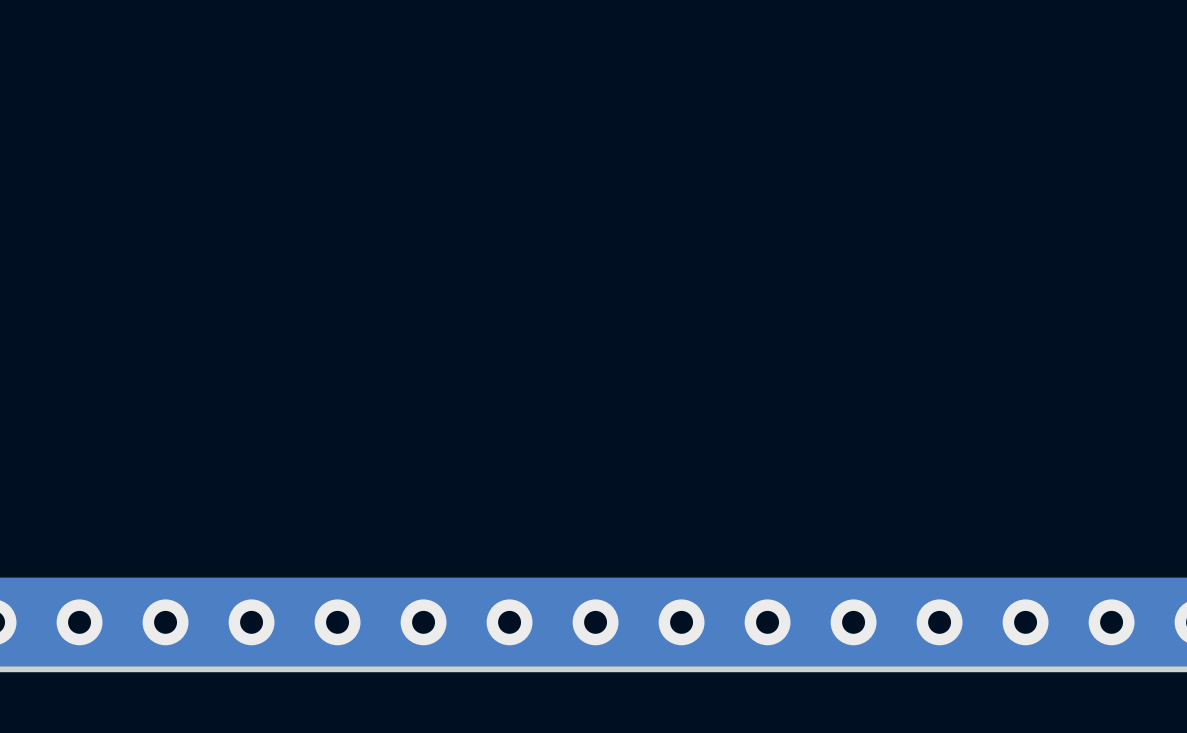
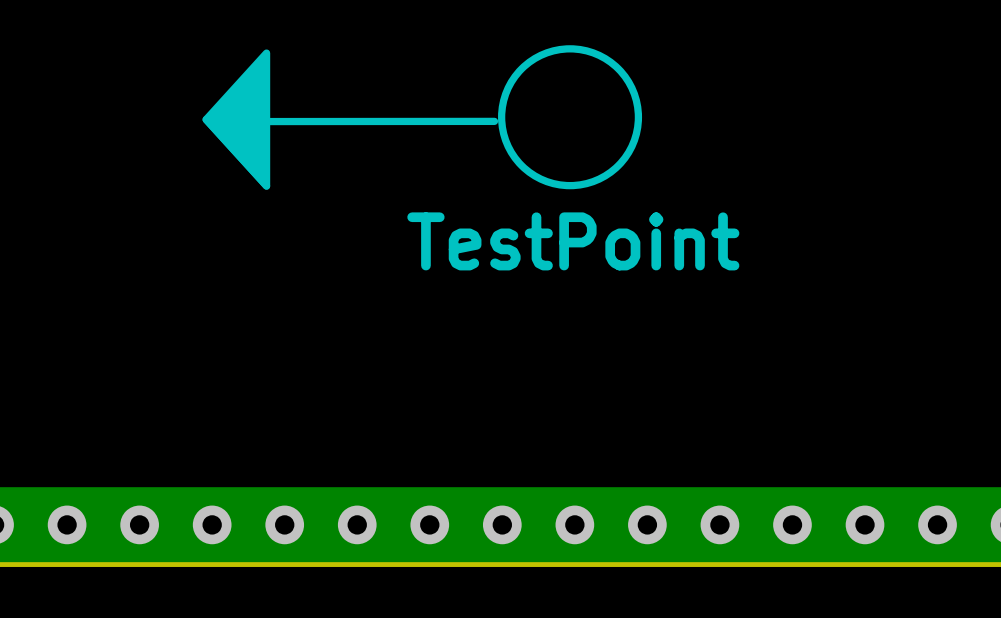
drawing: none -> [498, 45, 643, 190]
drawing: none -> [202, 49, 271, 190]
line: none -> (494, 121) (268, 121)
text: none -> TestPoint (573, 241)

